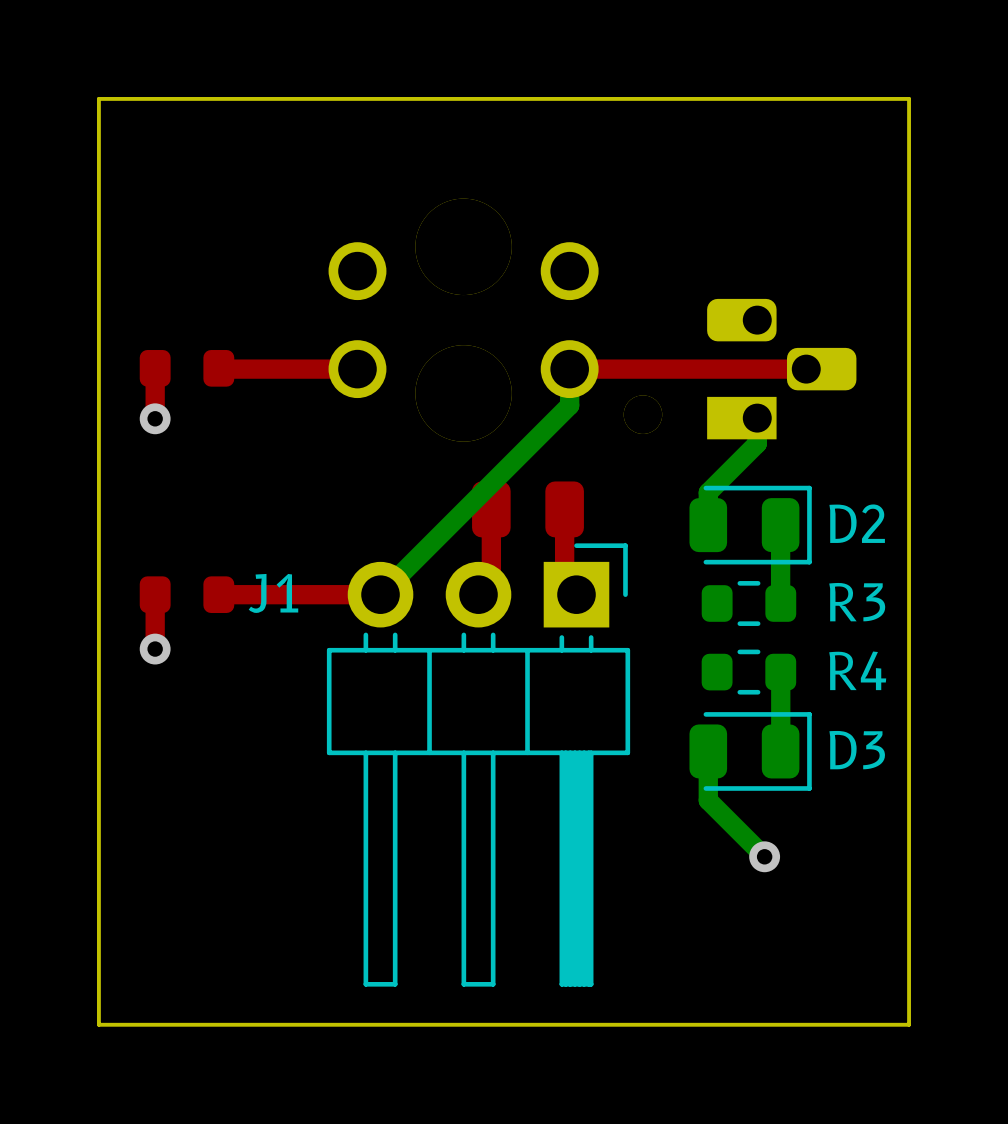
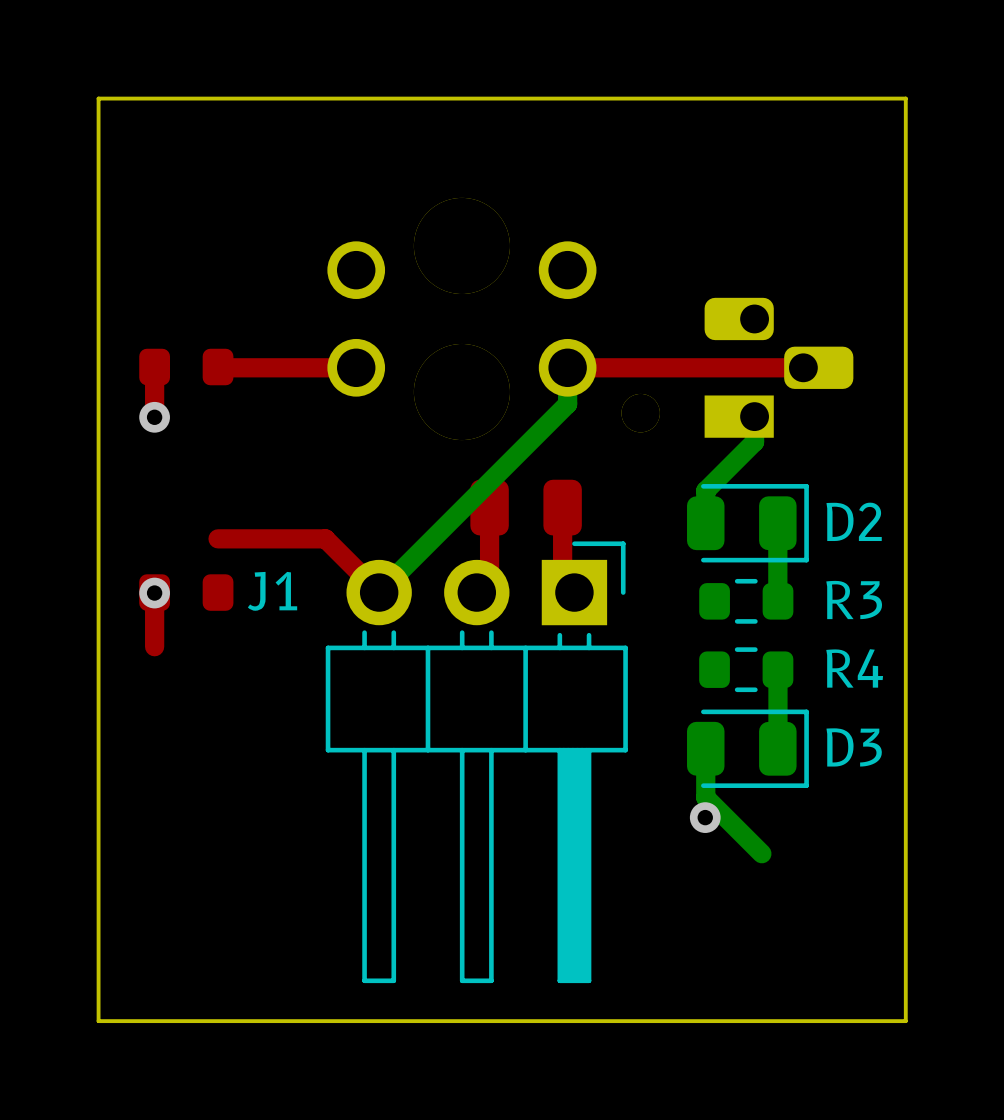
top track: (380, 594) (218, 594) -> (379, 592) (325, 538) (218, 538)
via position: (155, 649) -> (154, 593)
via position: (764, 856) -> (705, 817)

